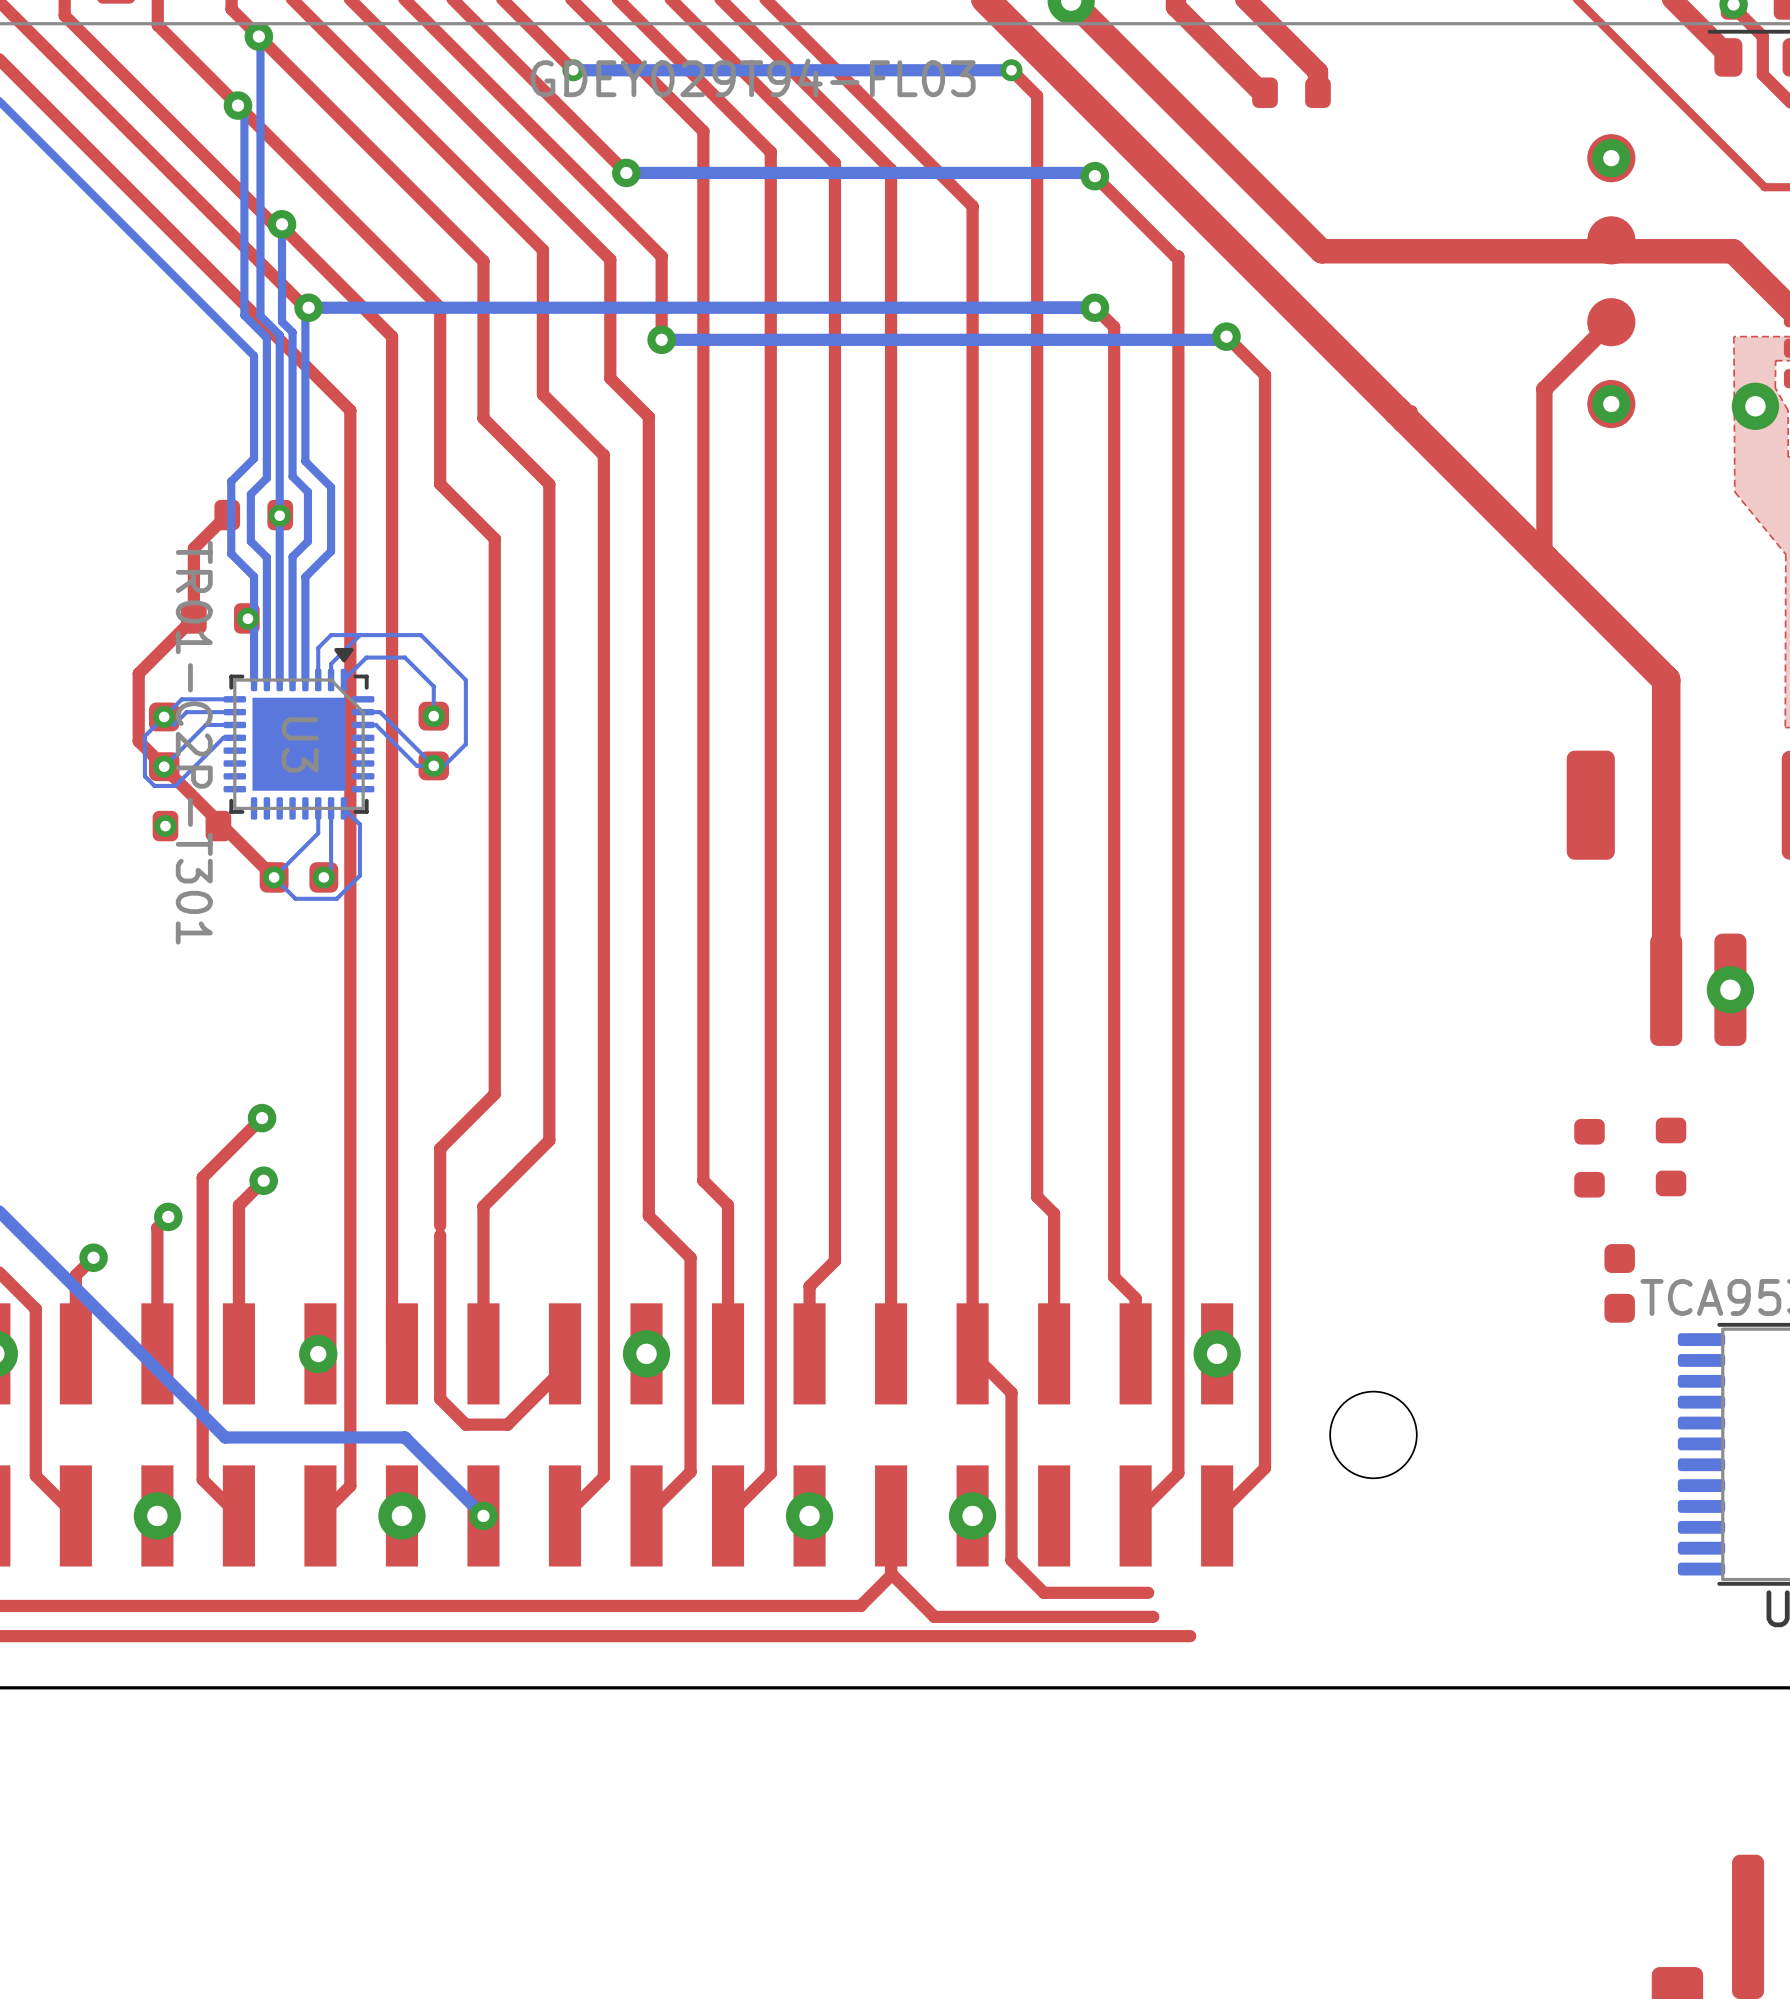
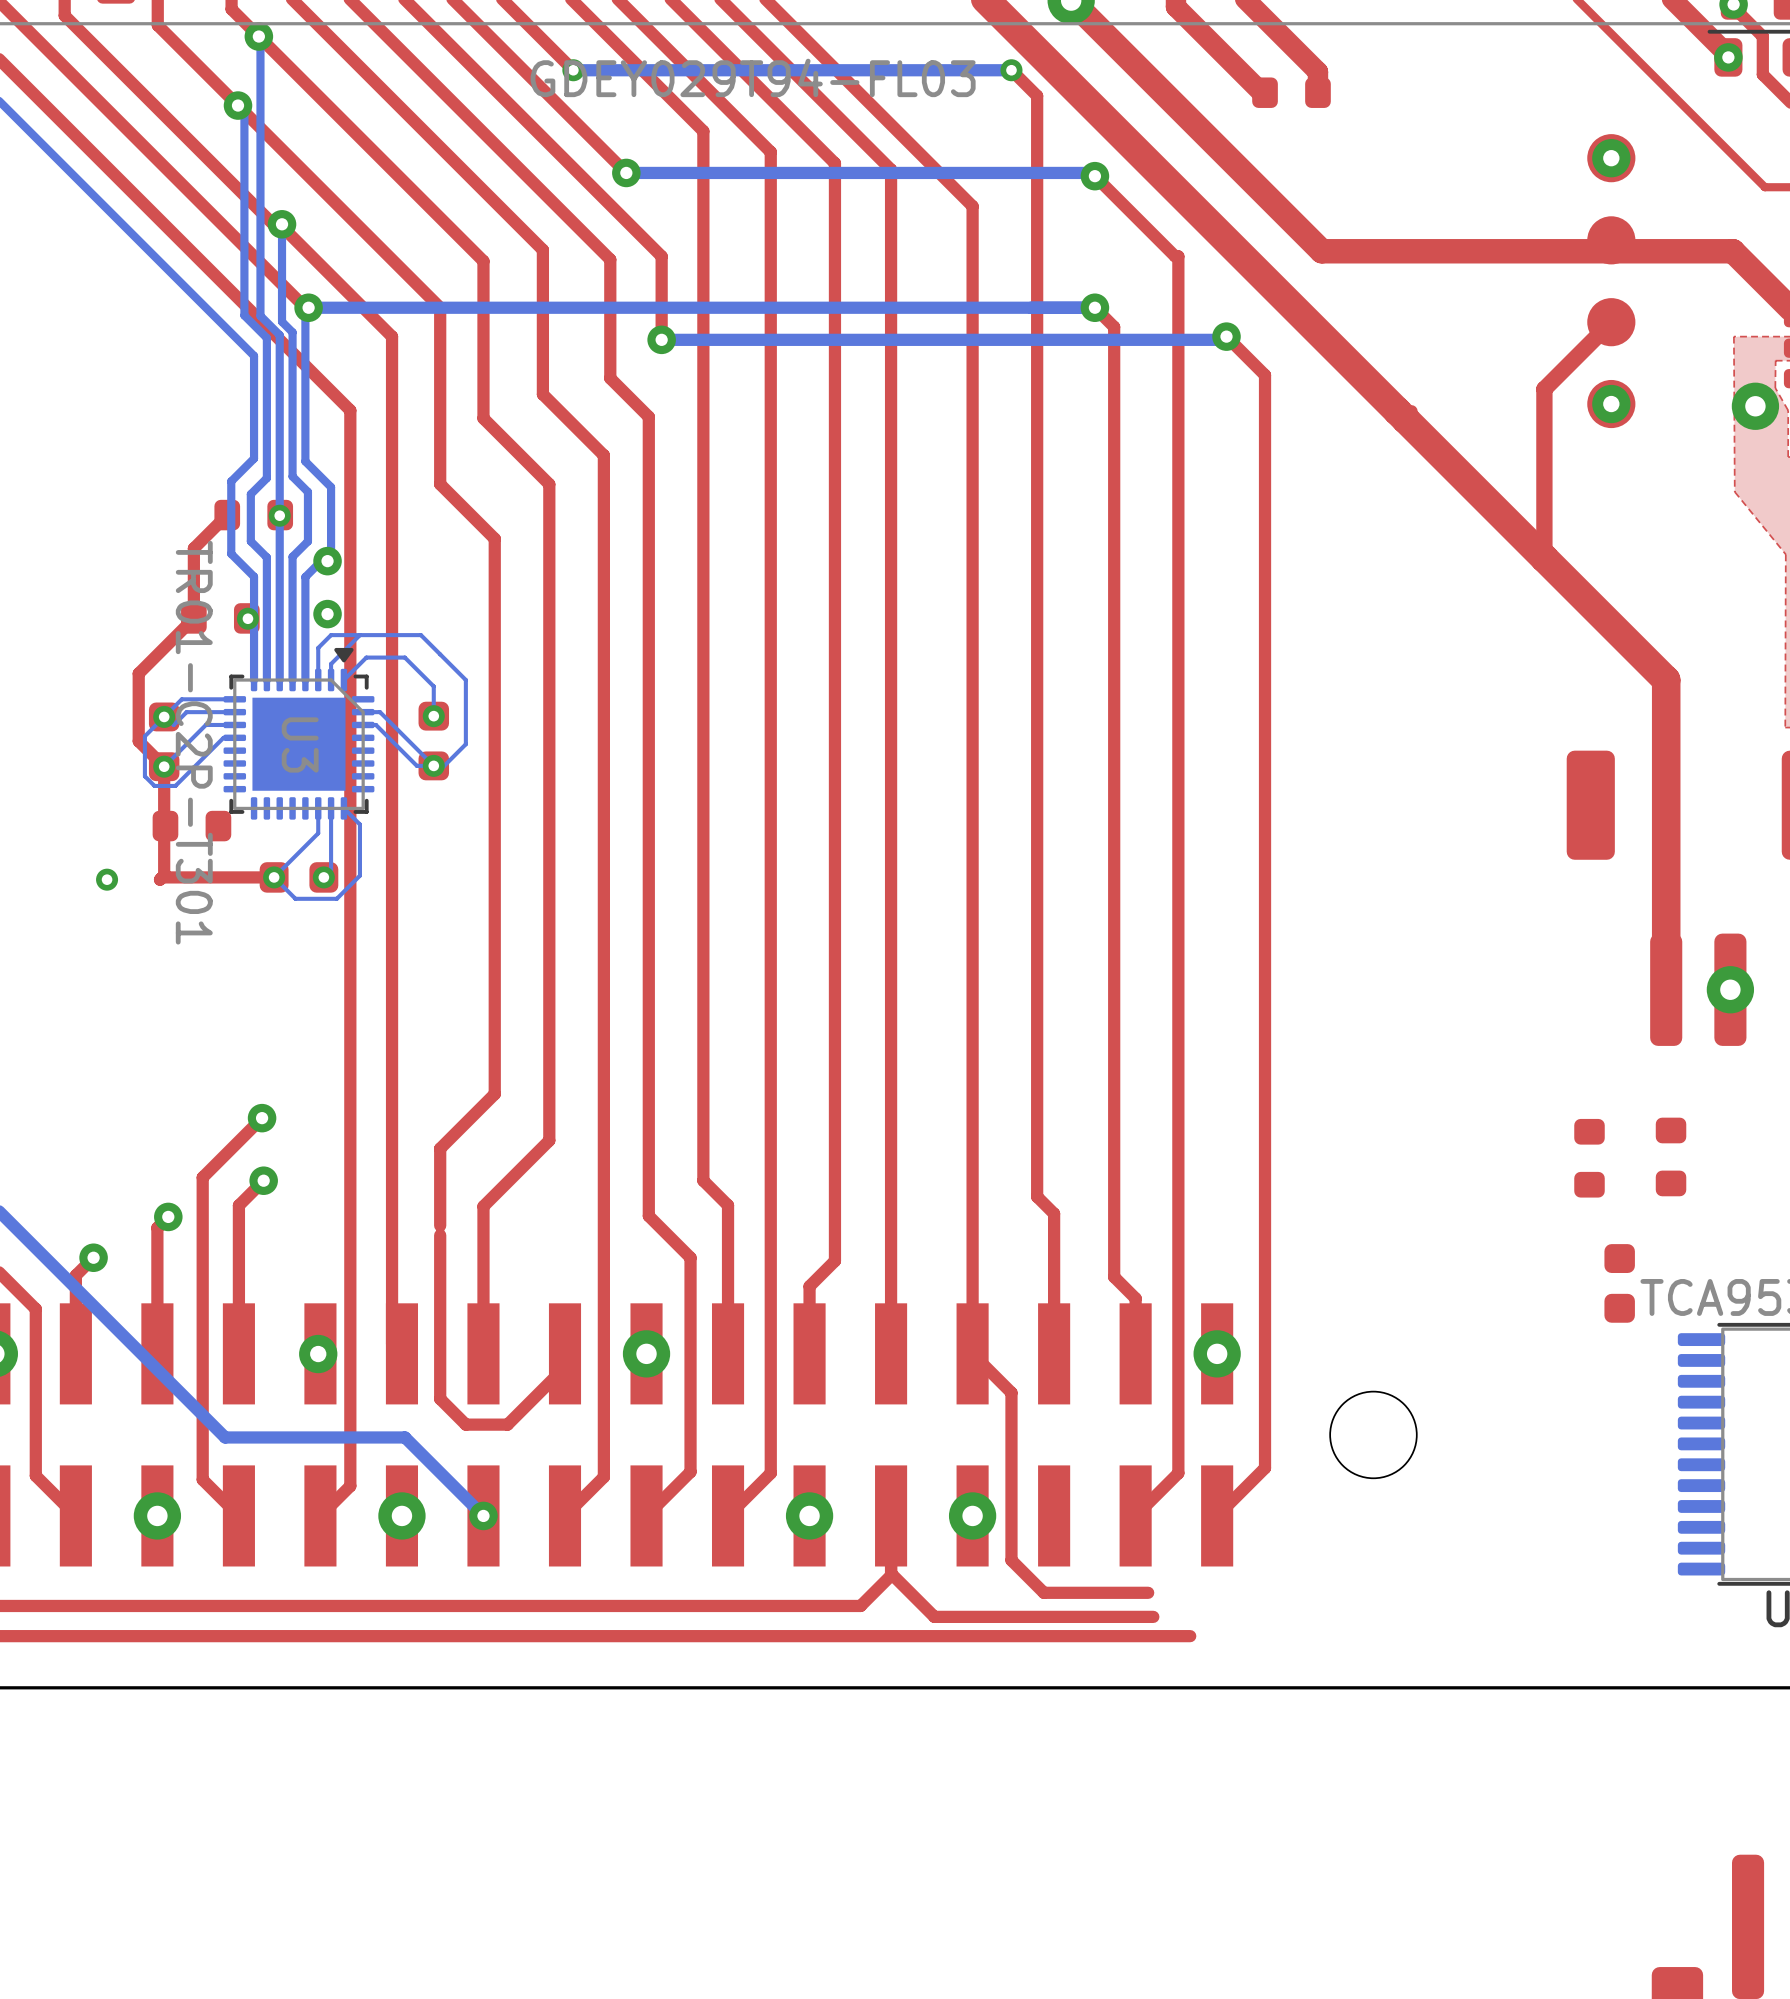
via: none -> (1728, 57)
via: none -> (327, 561)
via: none -> (327, 614)
top track: (164, 767) (274, 877) -> (162, 877) (274, 877)
top track: none -> (164, 767) (164, 875) (160, 879)
via position: (165, 826) -> (107, 879)

